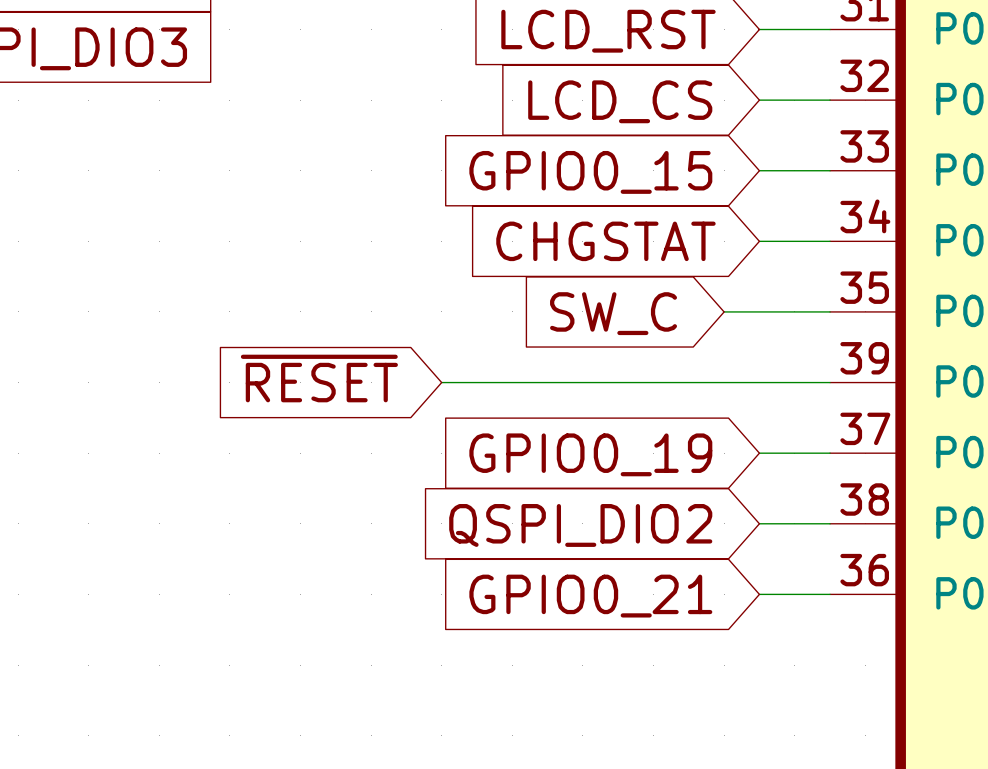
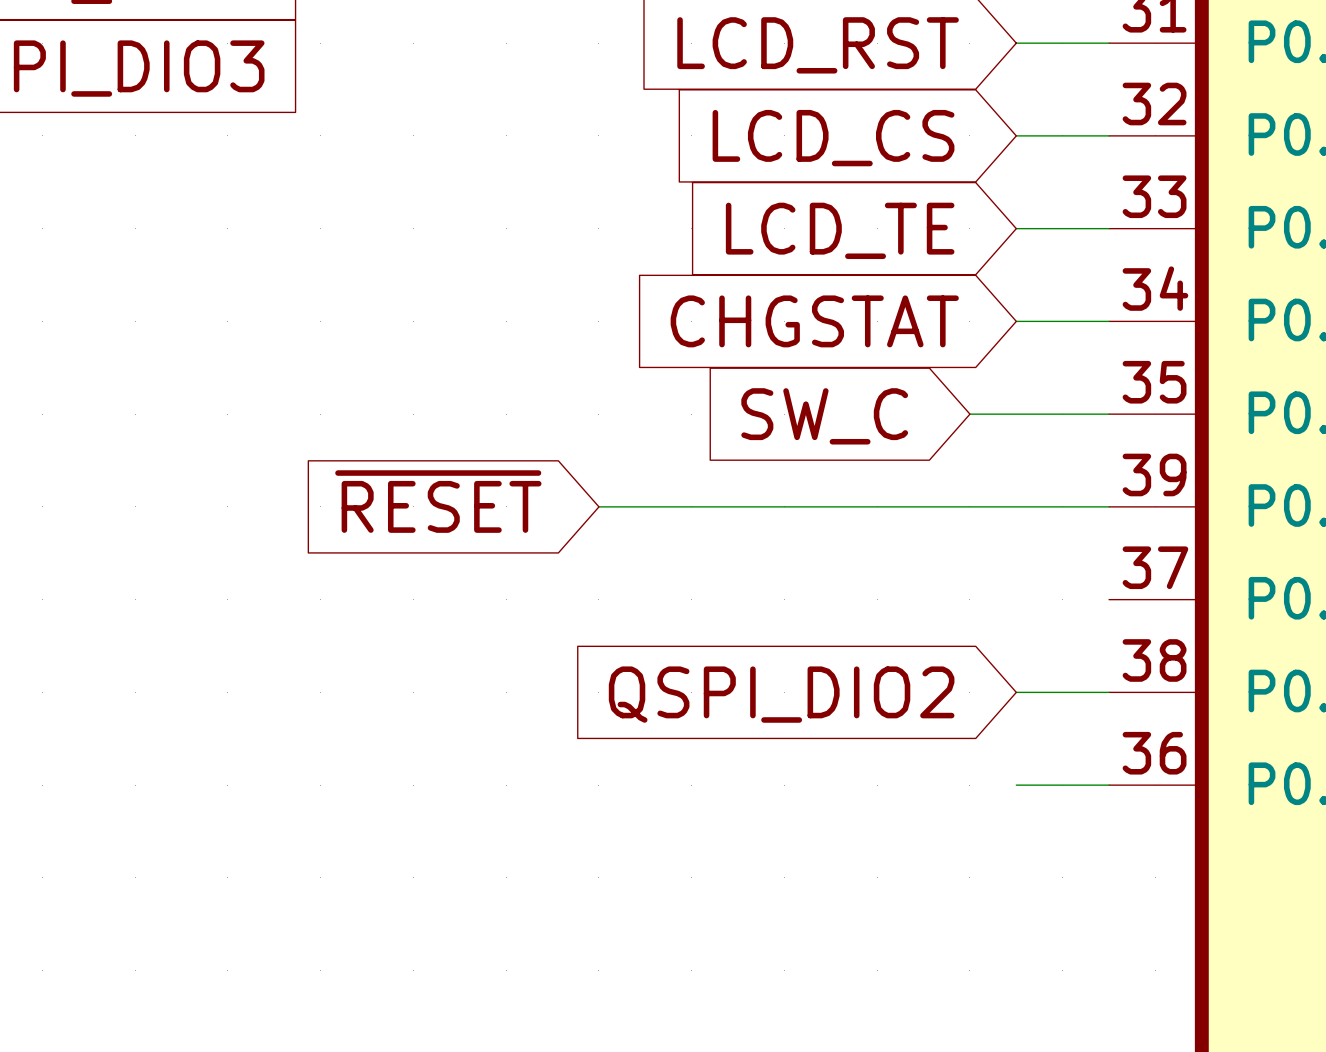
global label: GPIO0_15 (590, 172) -> LCD_TE (840, 230)
wire: (759, 453) (830, 453) -> none
global label: GPIO0_19 (590, 454) -> none
global label: GPIO0_21 (590, 596) -> none

